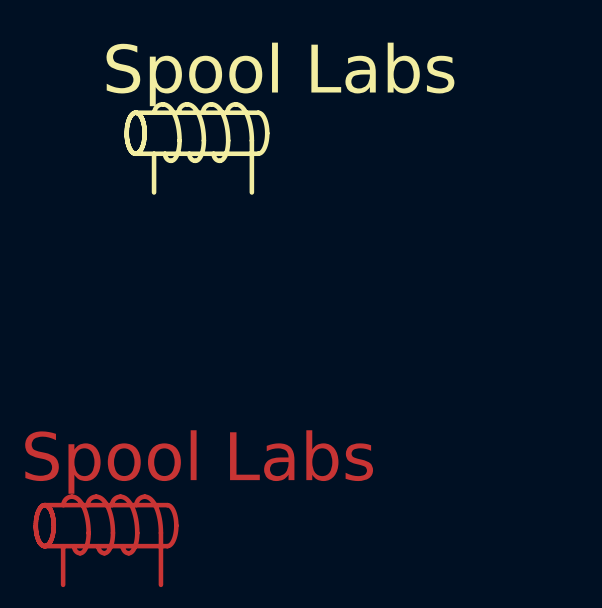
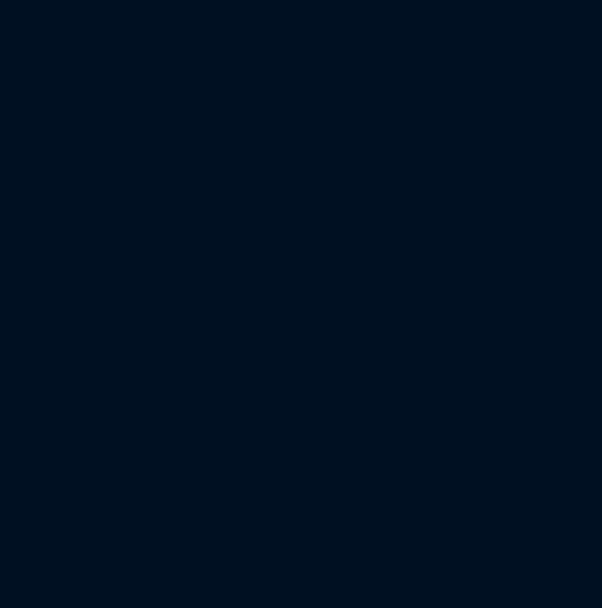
text: Spool Labs (280, 74) -> none
line: (135, 112) (129, 118) (126, 133) (129, 147) (135, 153) -> none
line: (135, 112) (142, 118) (144, 133) (142, 147) (135, 153) -> none
line: (135, 112) (259, 112) (265, 120) (267, 133) (265, 146) (259, 153) (135, 153) -> none
line: (154, 112) (158, 105) (166, 105) (172, 110) (177, 123) (179, 140) (177, 154) (170, 160) (166, 158) (165, 153) -> none
line: (178, 112) (182, 105) (190, 105) (196, 110) (201, 123) (203, 140) (201, 154) (194, 160) (190, 158) (189, 153) -> none
line: (202, 112) (206, 105) (214, 105) (220, 110) (226, 123) (228, 140) (225, 154) (219, 160) (215, 158) (213, 153) -> none
line: (227, 112) (231, 105) (239, 105) (244, 110) (249, 120) (251, 136) (251, 192) -> none
line: (154, 153) (154, 192) -> none
text: Spool Labs (199, 462) -> none
top track: (44, 505) (38, 511) (35, 525) (38, 540) (44, 546) -> none
top track: (44, 505) (51, 511) (53, 525) (51, 540) (44, 546) -> none
top track: (44, 505) (168, 505) (174, 512) (176, 525) (174, 538) (168, 546) (44, 546) -> none
top track: (63, 505) (67, 498) (75, 497) (81, 502) (86, 515) (88, 532) (86, 547) (79, 553) (75, 550) (74, 546) -> none
top track: (87, 505) (91, 498) (99, 497) (105, 502) (110, 515) (112, 532) (110, 547) (103, 553) (99, 550) (98, 546) -> none
top track: (112, 505) (115, 498) (123, 497) (129, 502) (135, 515) (137, 532) (134, 547) (128, 553) (124, 550) (122, 546) -> none
top track: (136, 505) (140, 498) (148, 497) (153, 502) (158, 512) (160, 529) (160, 584) -> none
top track: (63, 546) (63, 584) -> none

